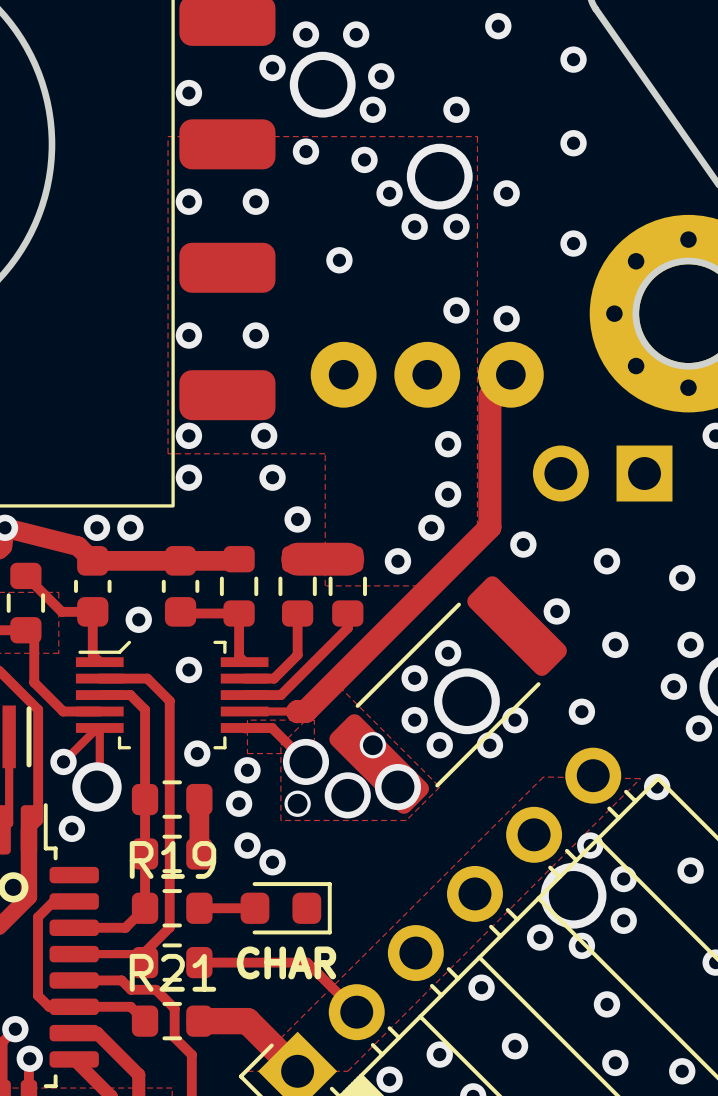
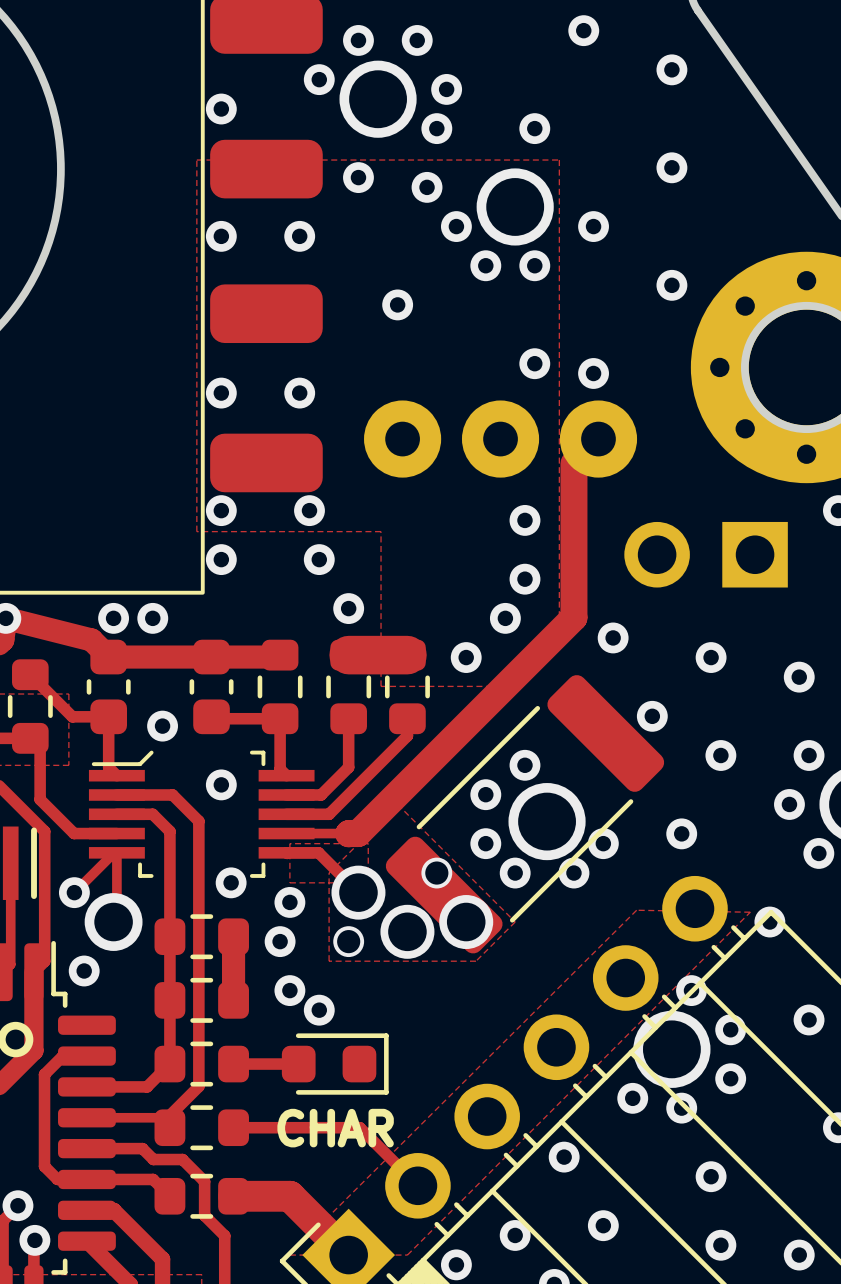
R19 name: R19 (172, 859) -> none
R21 name: R21 (172, 972) -> none

